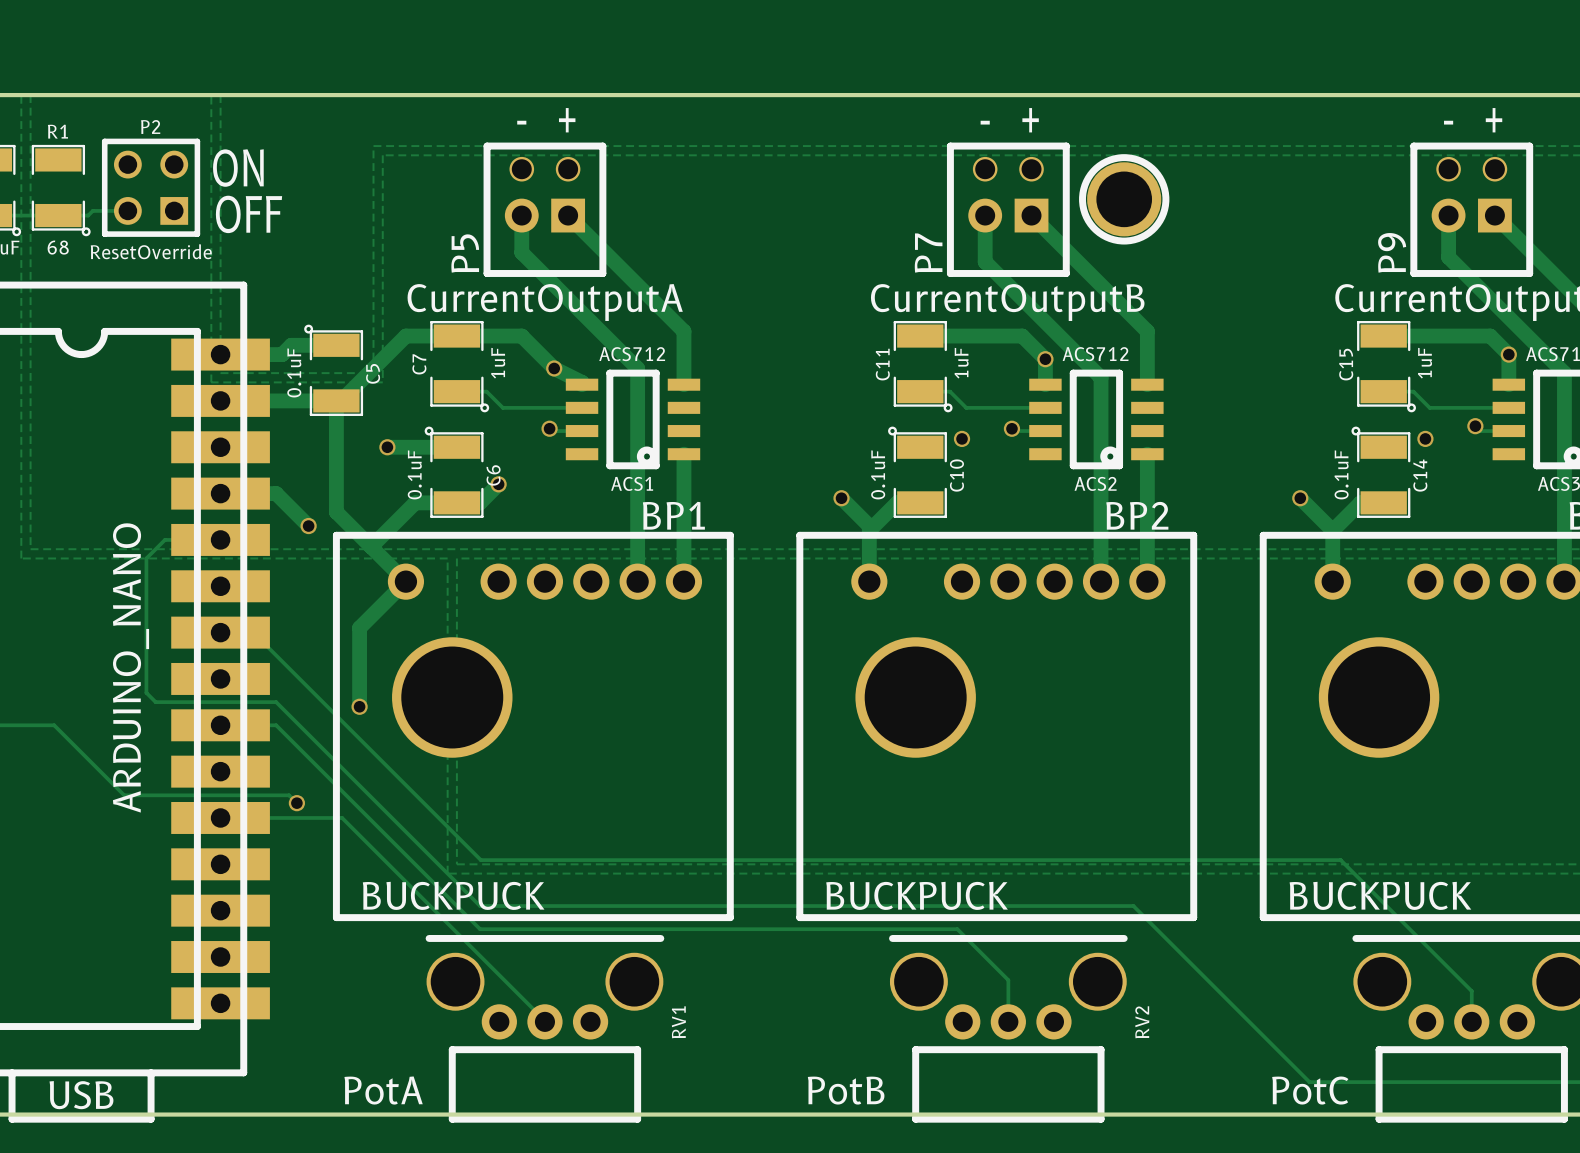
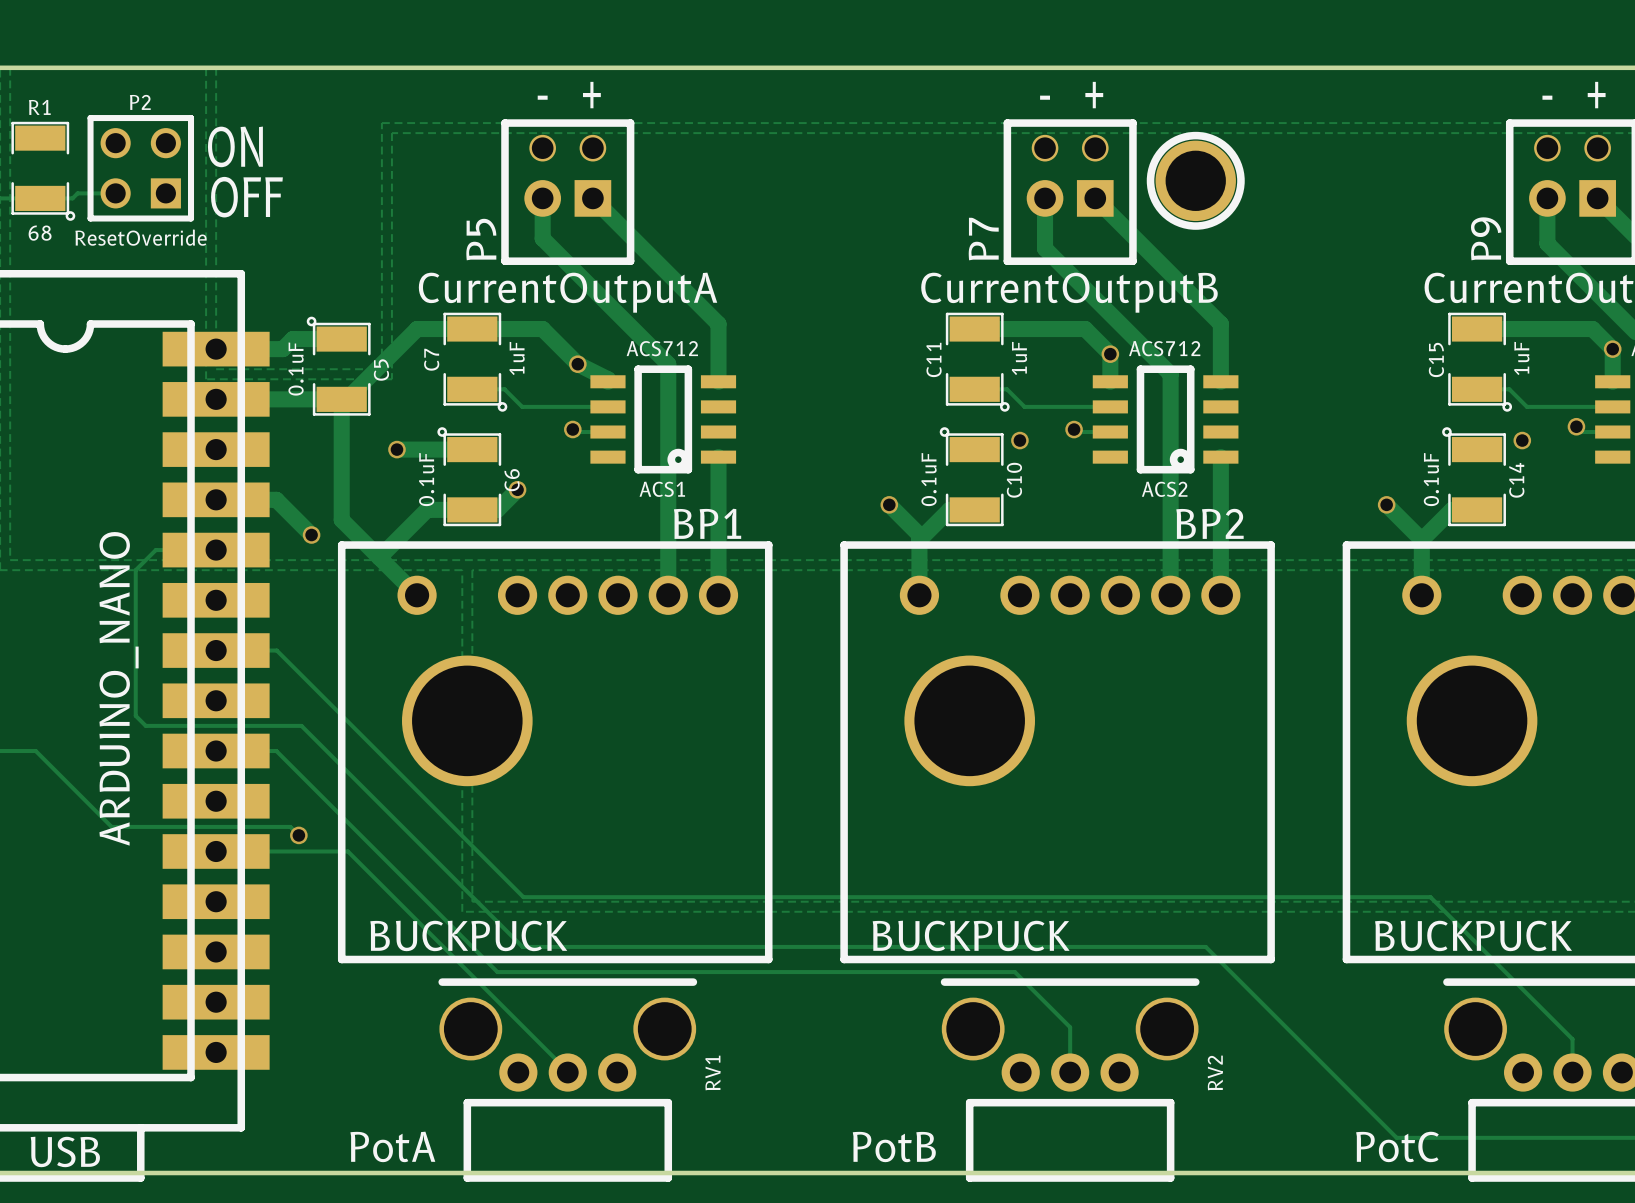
track: (405, 581) (359, 627) (359, 706) -> none
track: (253, 632) (480, 860) (504, 860) -> (251, 650) (276, 650) (523, 897)
track: (276, 702) (480, 906) (503, 906) -> (276, 725) (301, 725) (522, 946)
via: (359, 706) -> none

